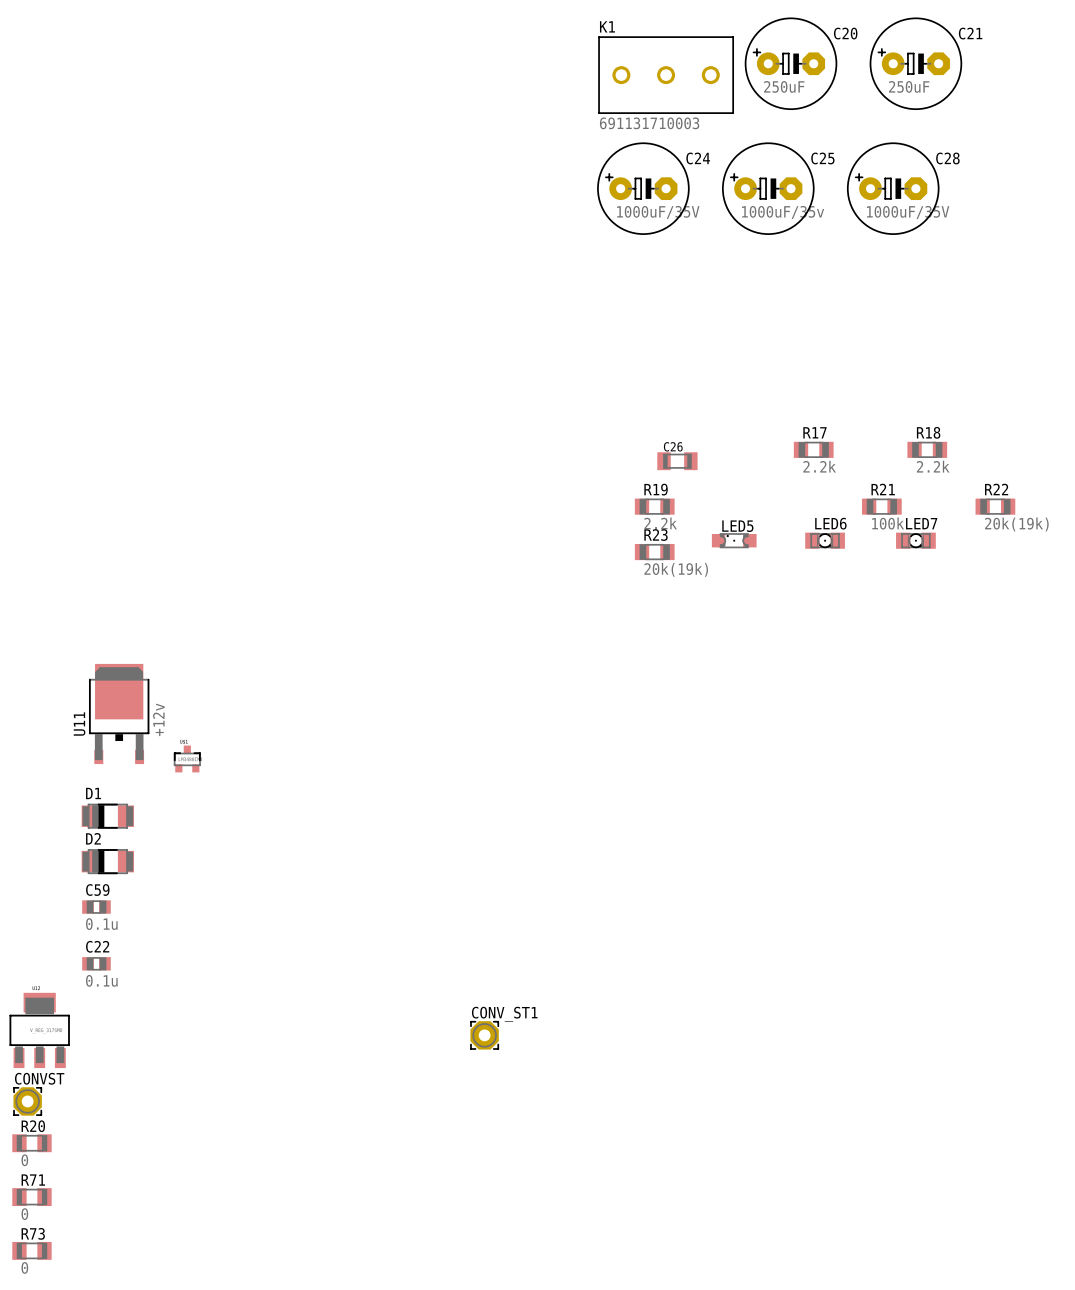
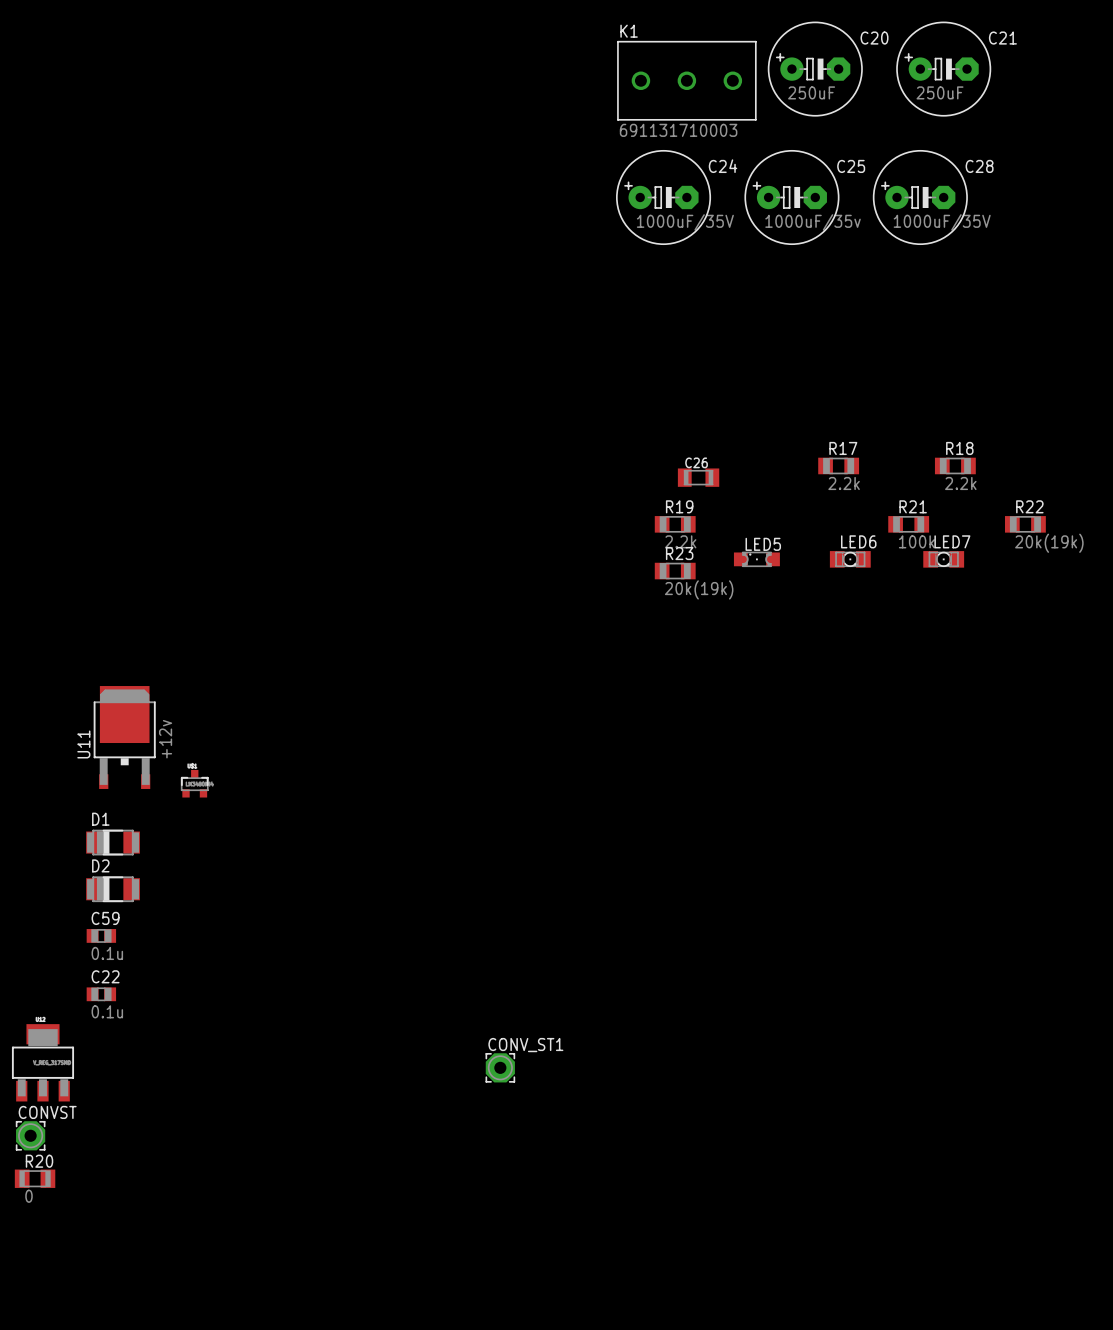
R71: 0 (31, 1197) -> none
R73: 0 (31, 1250) -> none

